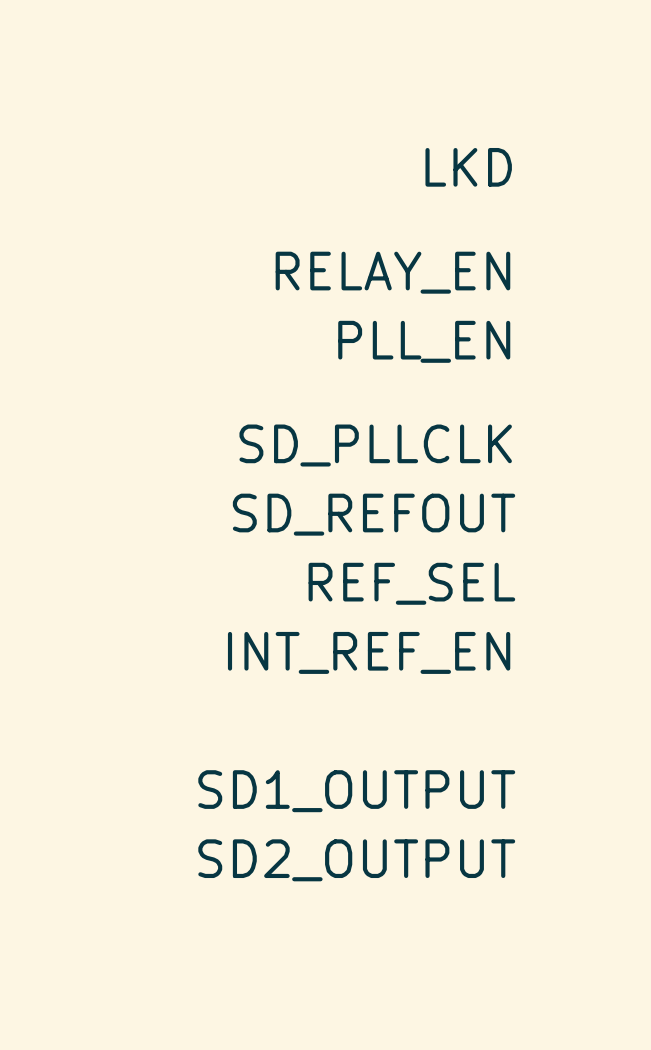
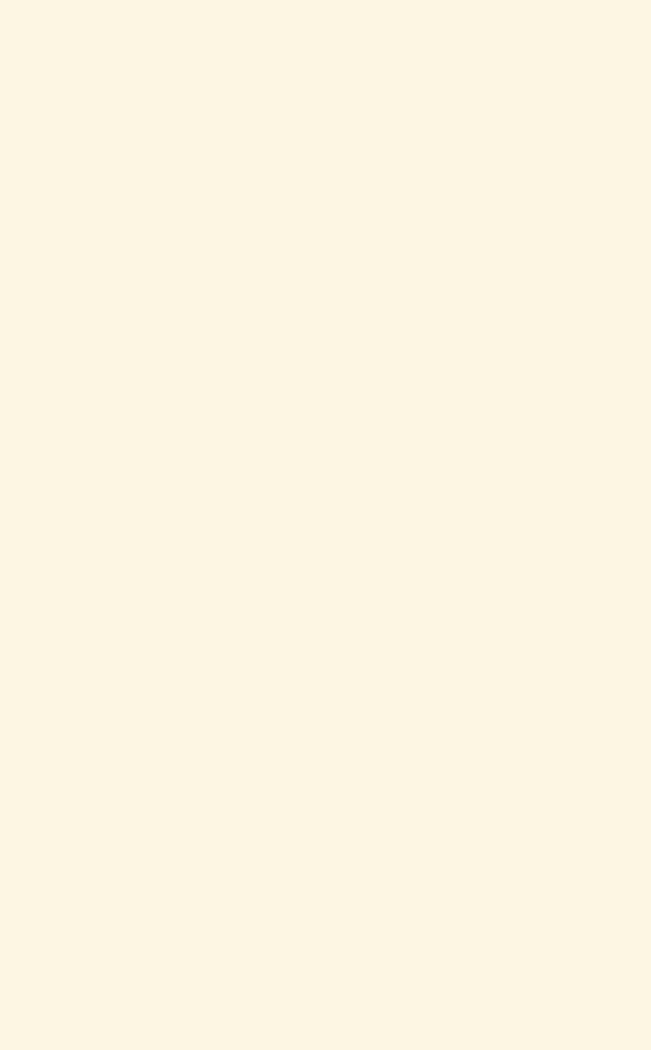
label: LKD (468, 167) -> none
label: RELAY_EN (392, 272) -> none
label: PLL_EN (424, 341) -> none
label: SD_PLLCLK (375, 445) -> none
label: SD_REFOUT (374, 514) -> none
label: REF_SEL (411, 583) -> none
label: INT_REF_EN (369, 652) -> none
label: SD1_OUTPUT (356, 791) -> none
label: SD2_OUTPUT (356, 860) -> none

